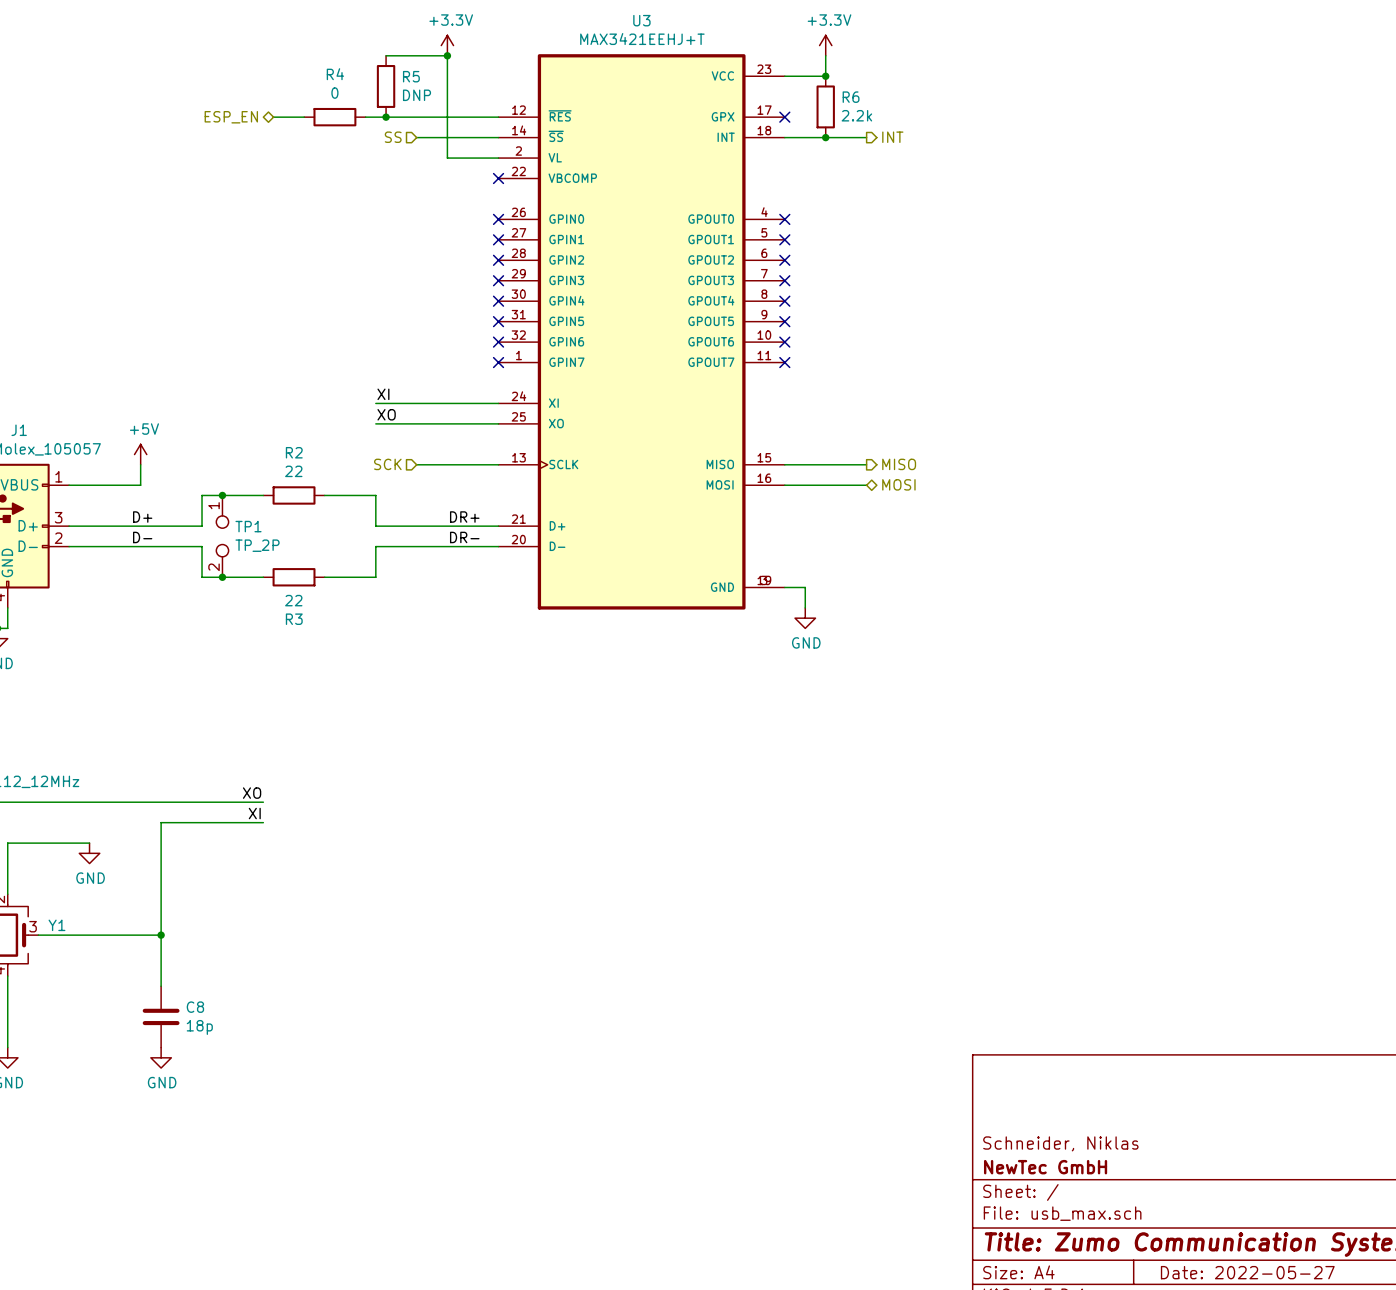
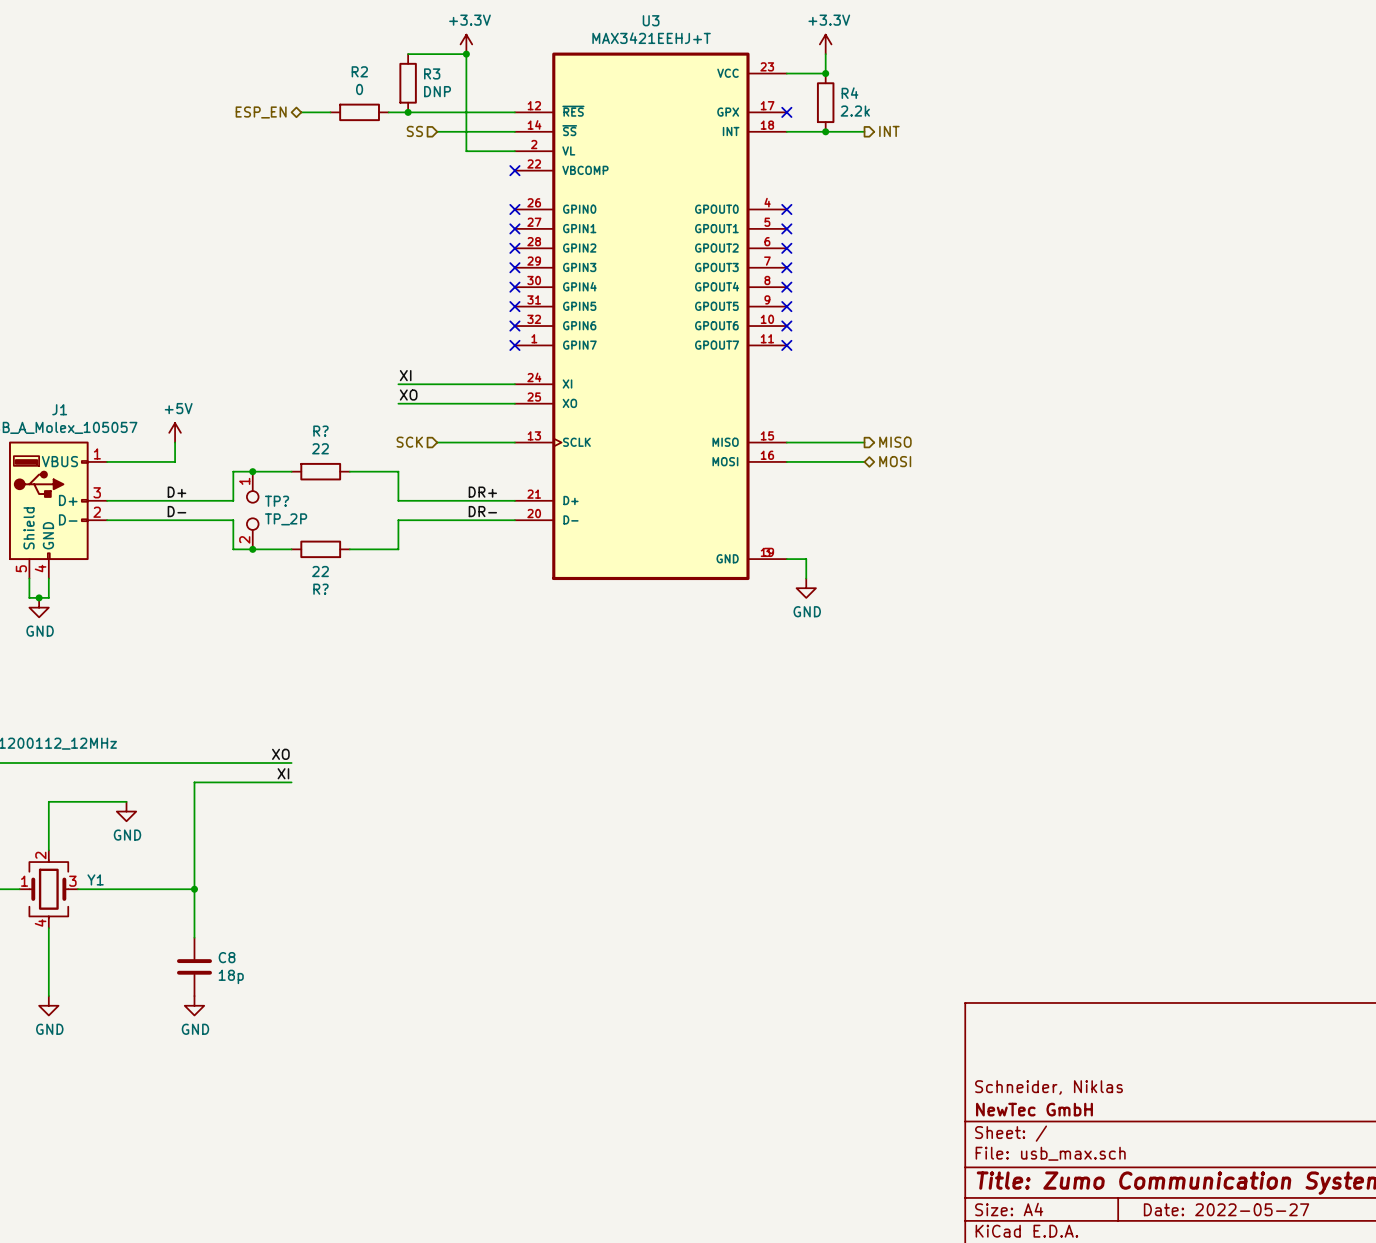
R4 name: R4 (335, 74) -> R2 (359, 71)
R5 name: R5 (411, 76) -> R3 (432, 73)
R6 name: R6 (851, 97) -> R4 (849, 93)
R2 name: R2 (294, 452) -> R? (320, 431)
TP1 name: TP1 (248, 526) -> TP? (277, 501)
R3 name: R3 (294, 619) -> R? (320, 589)

